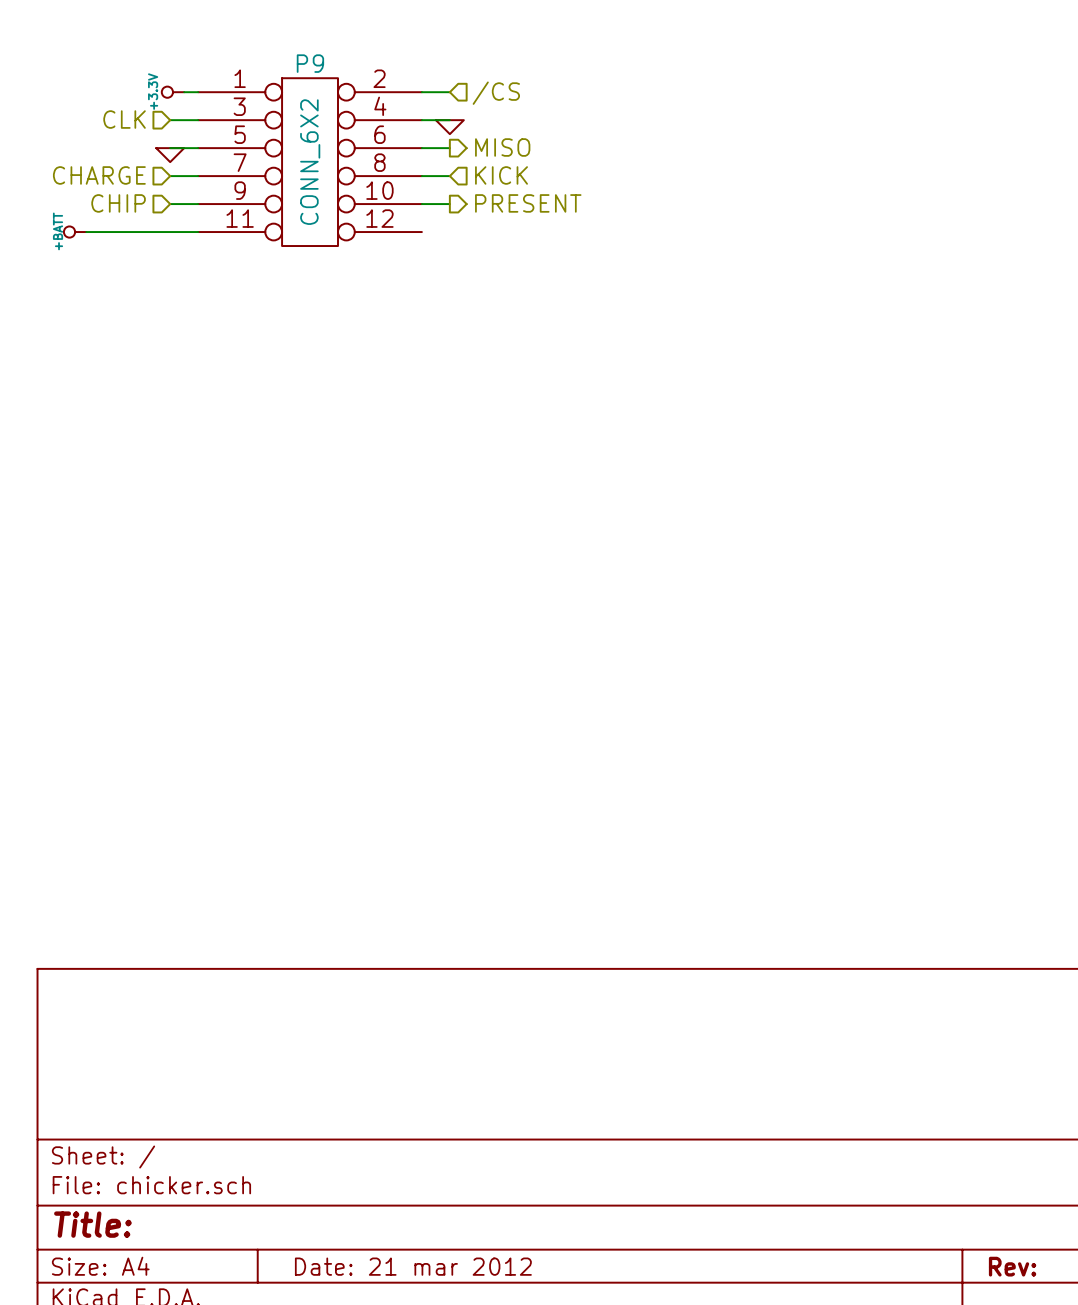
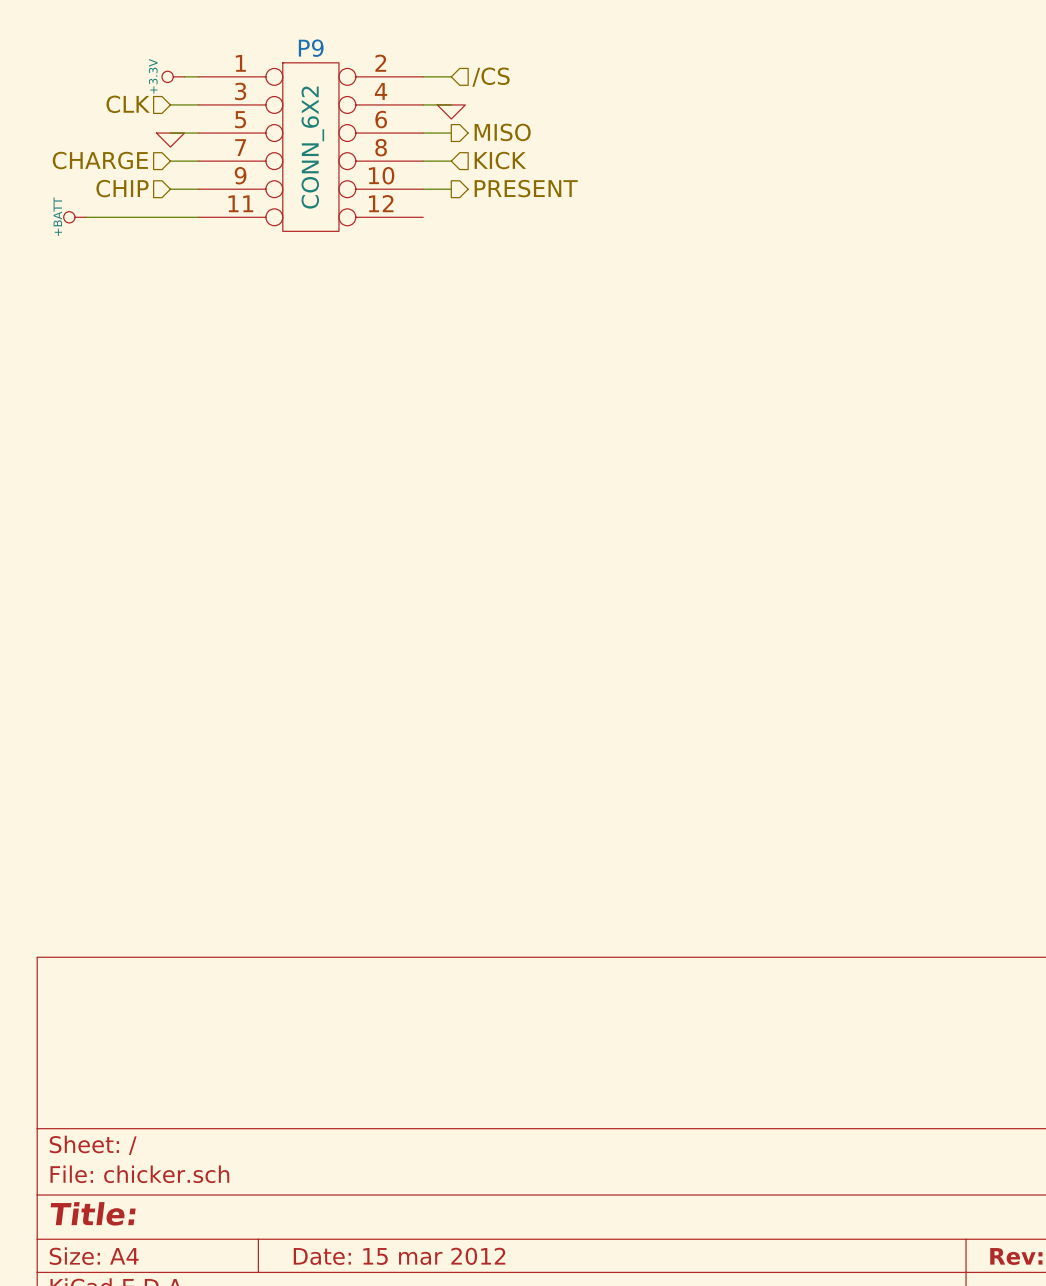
title block: Date: 21 mar 2012 (413, 1266) -> Date: 15 mar 2012 (399, 1256)

